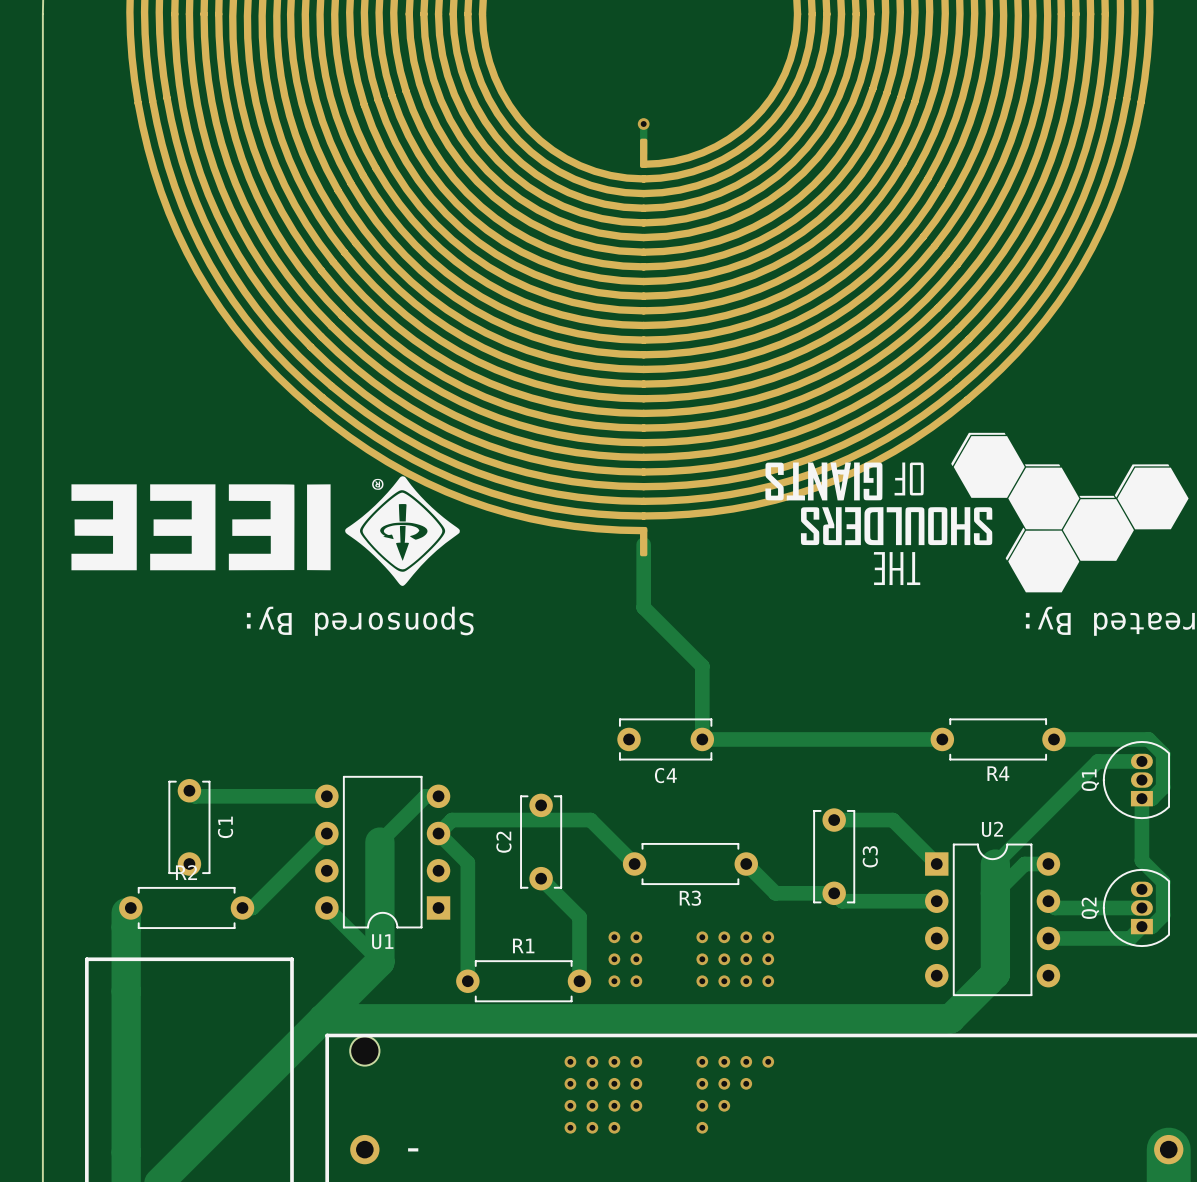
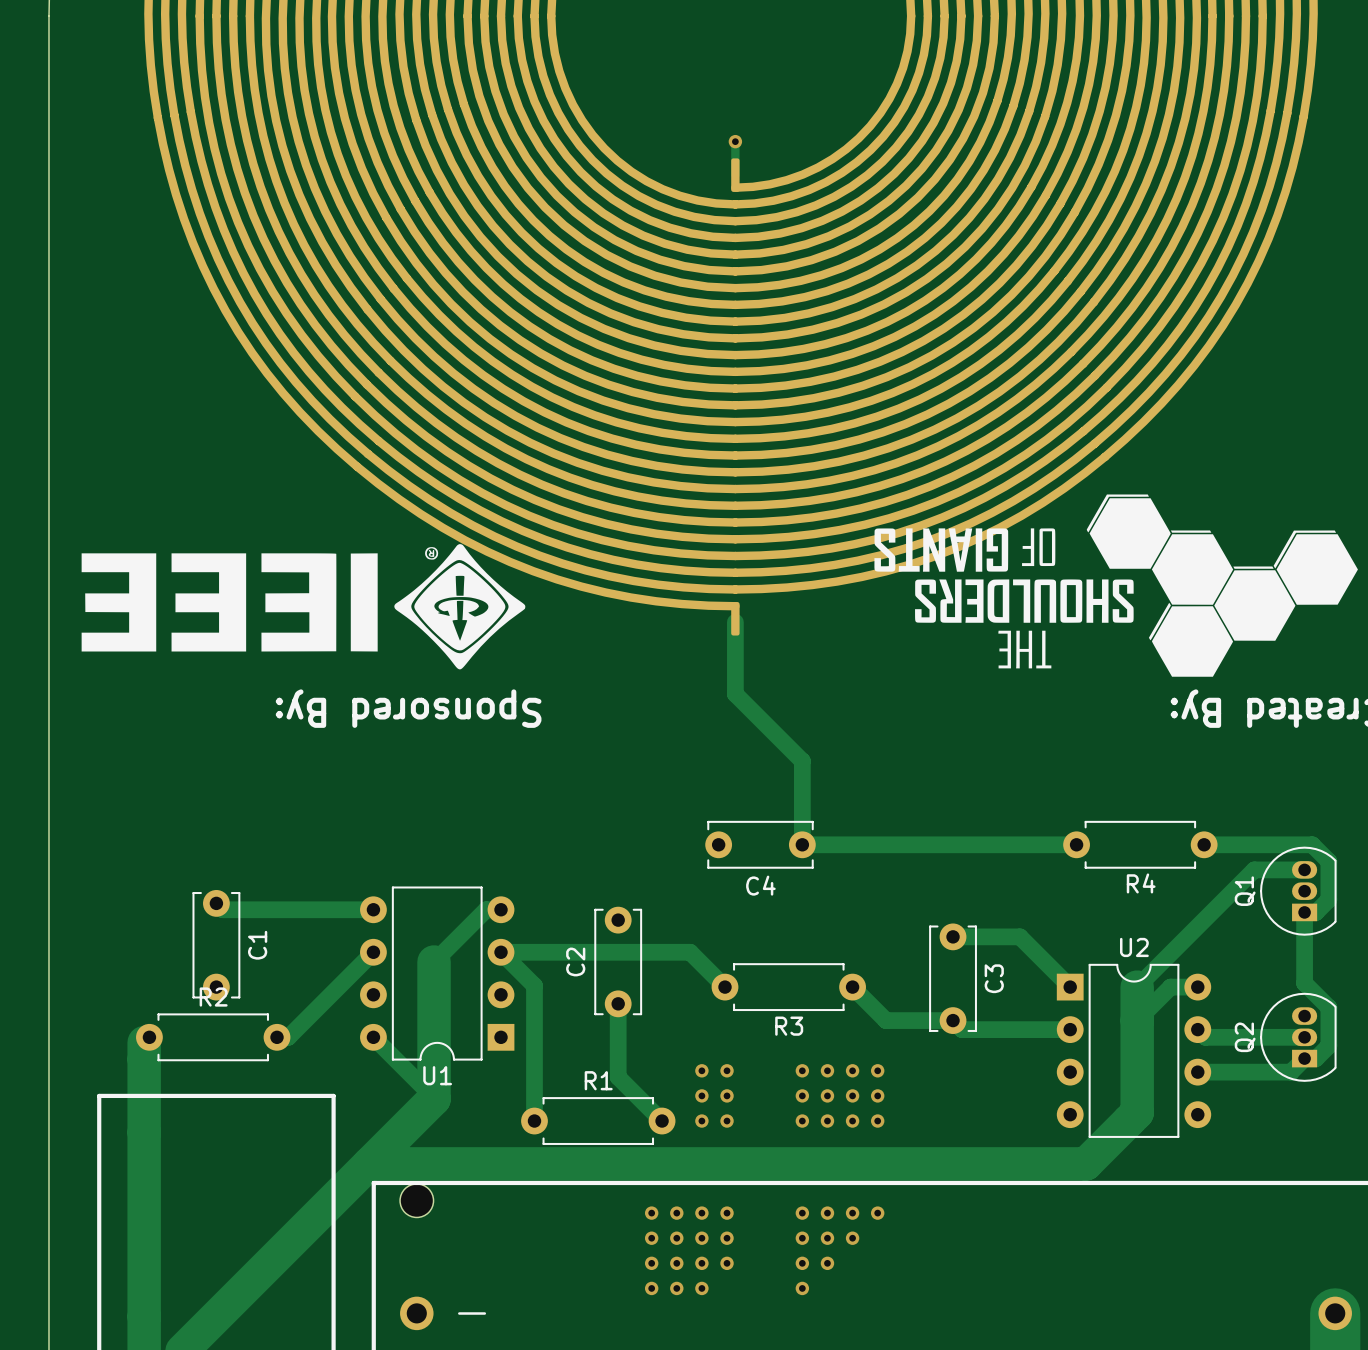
track: (438, 833) (452, 820) (590, 820) (604, 833) -> (501, 952) (690, 952)
track: (541, 878) (579, 917) (579, 981) -> (618, 1003) (618, 1077) (662, 1121)

